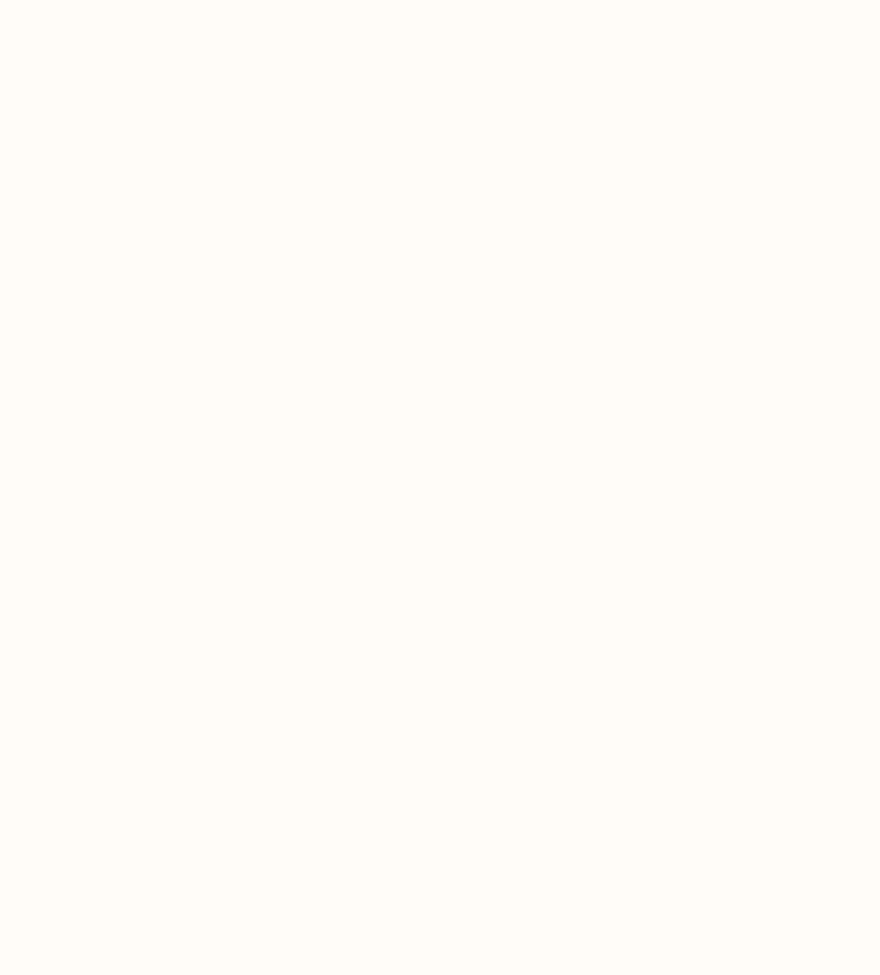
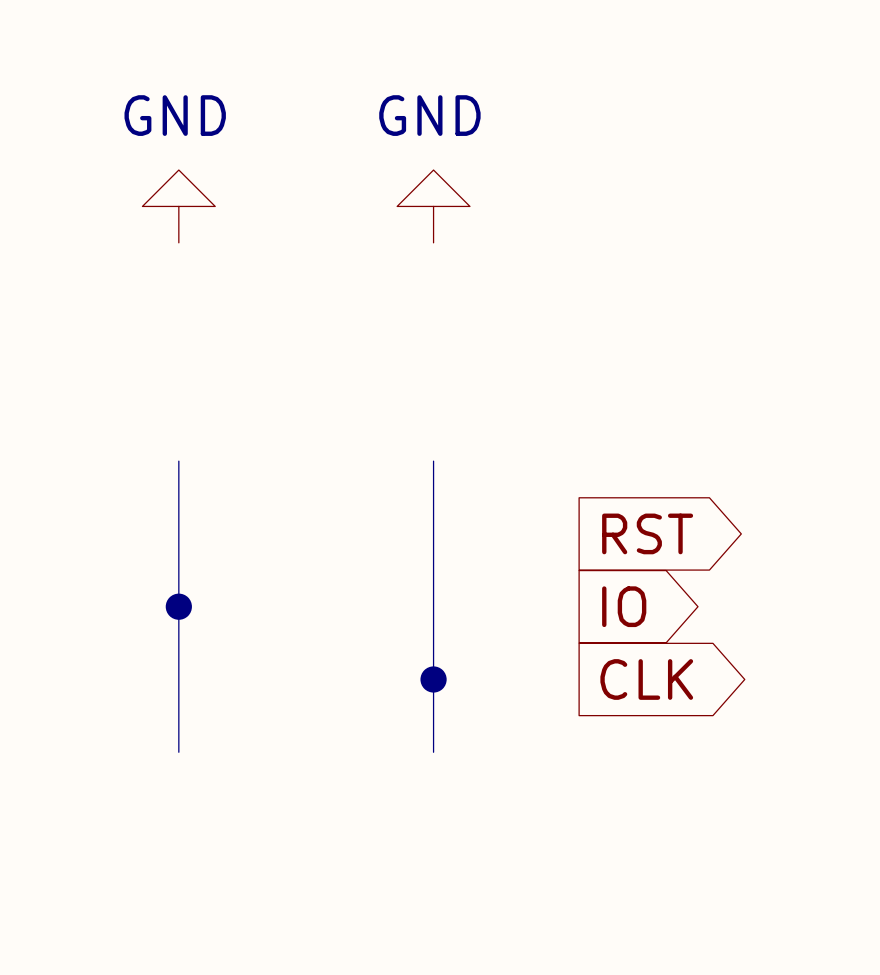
power symbol: none -> GND (178, 206)
power symbol: none -> GND (433, 206)
wire: none -> (178, 461) (178, 752)
wire: none -> (433, 461) (433, 752)
global label: none -> RST (647, 533)
junction: none -> (178, 606)
global label: none -> IO (624, 606)
junction: none -> (433, 679)
global label: none -> CLK (646, 679)

